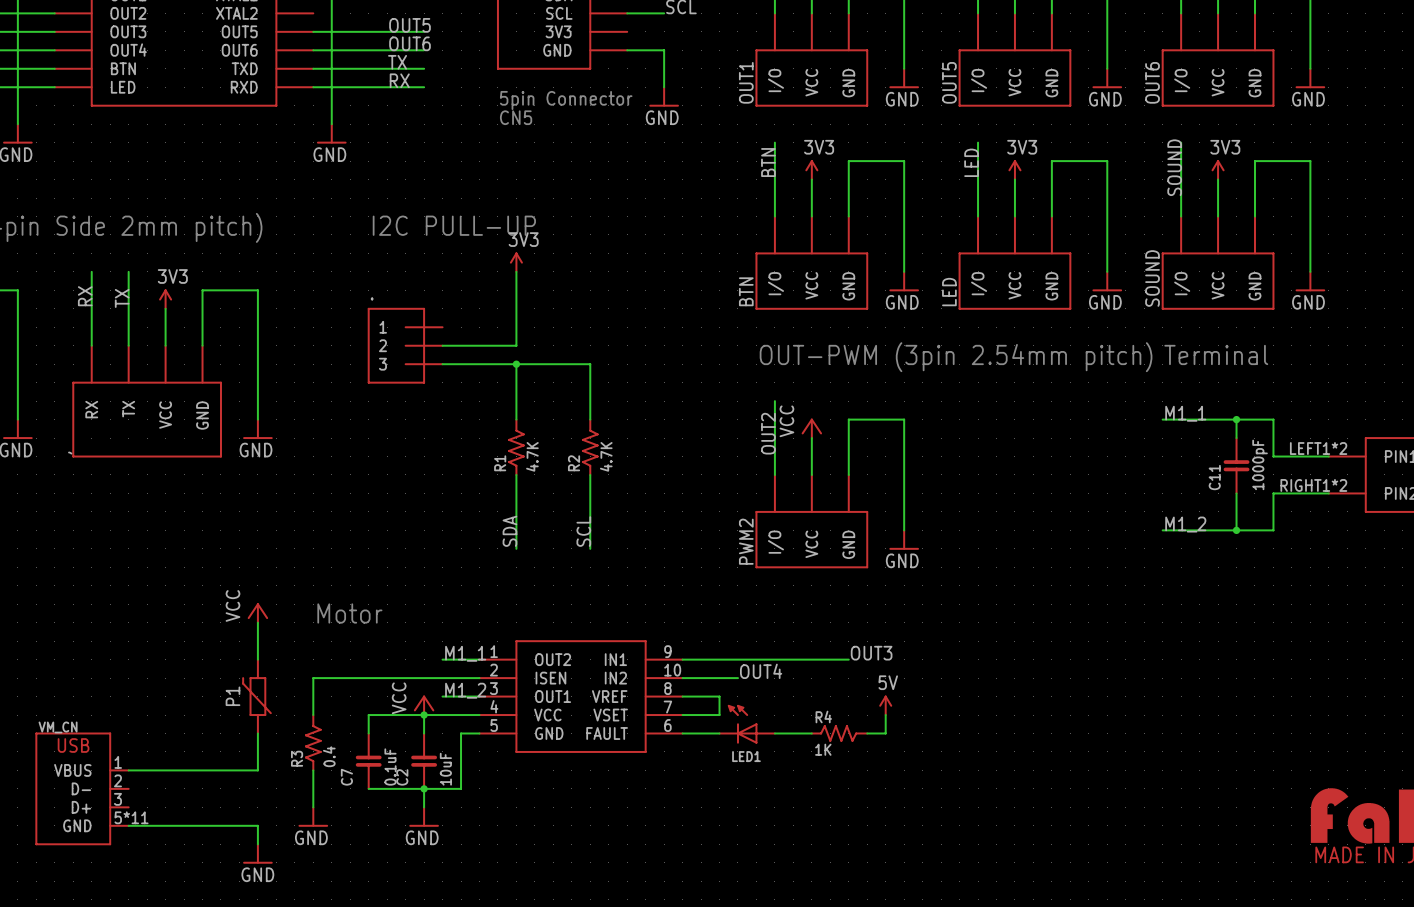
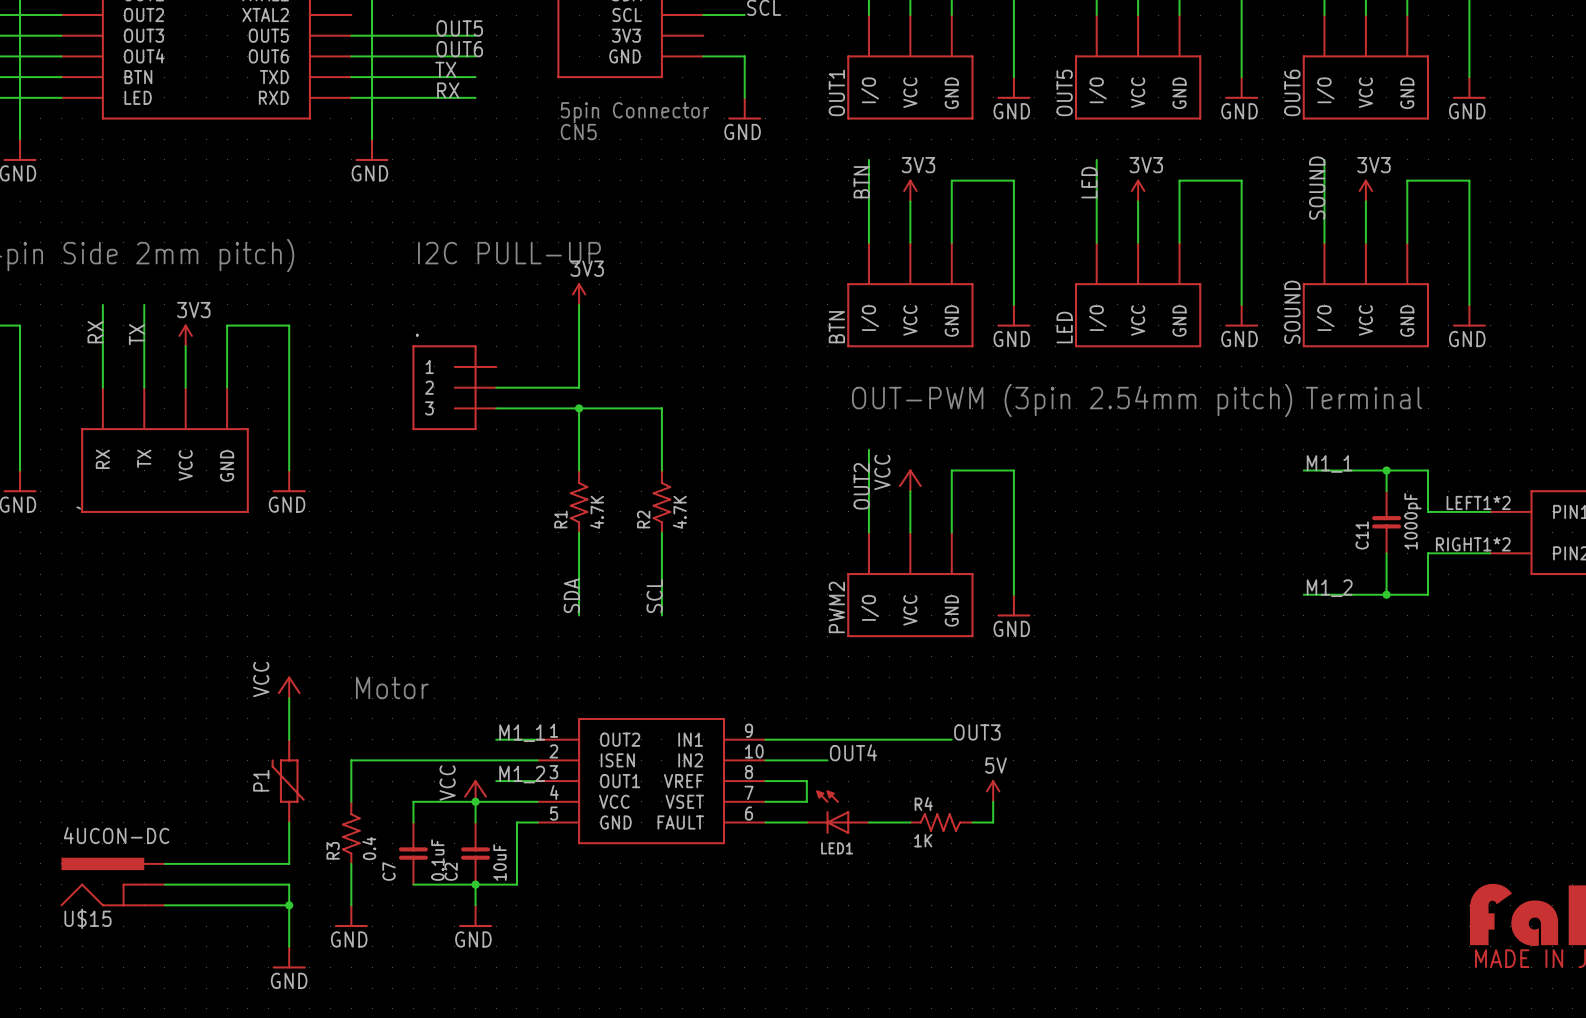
U$15: none -> 4UCON-DC (112, 881)
VM_CN: (82, 788) -> none
wire: none -> (164, 905) (289, 905)
junction: none -> (289, 905)
wire: (128, 825) (257, 825) -> (164, 884) (289, 884) (289, 926)

